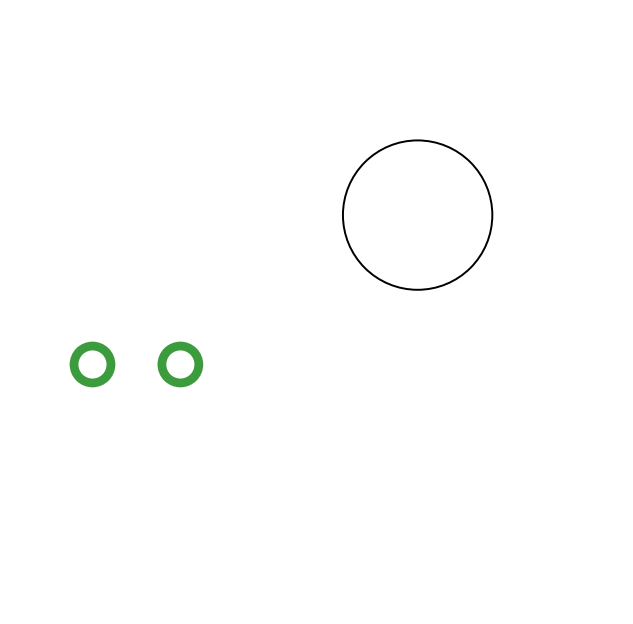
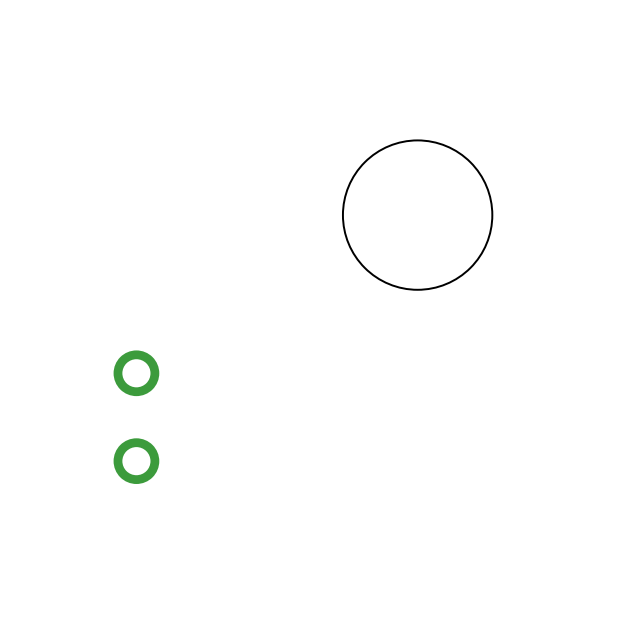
part rotation: 0° (136, 364) -> 90° clockwise (136, 417)

